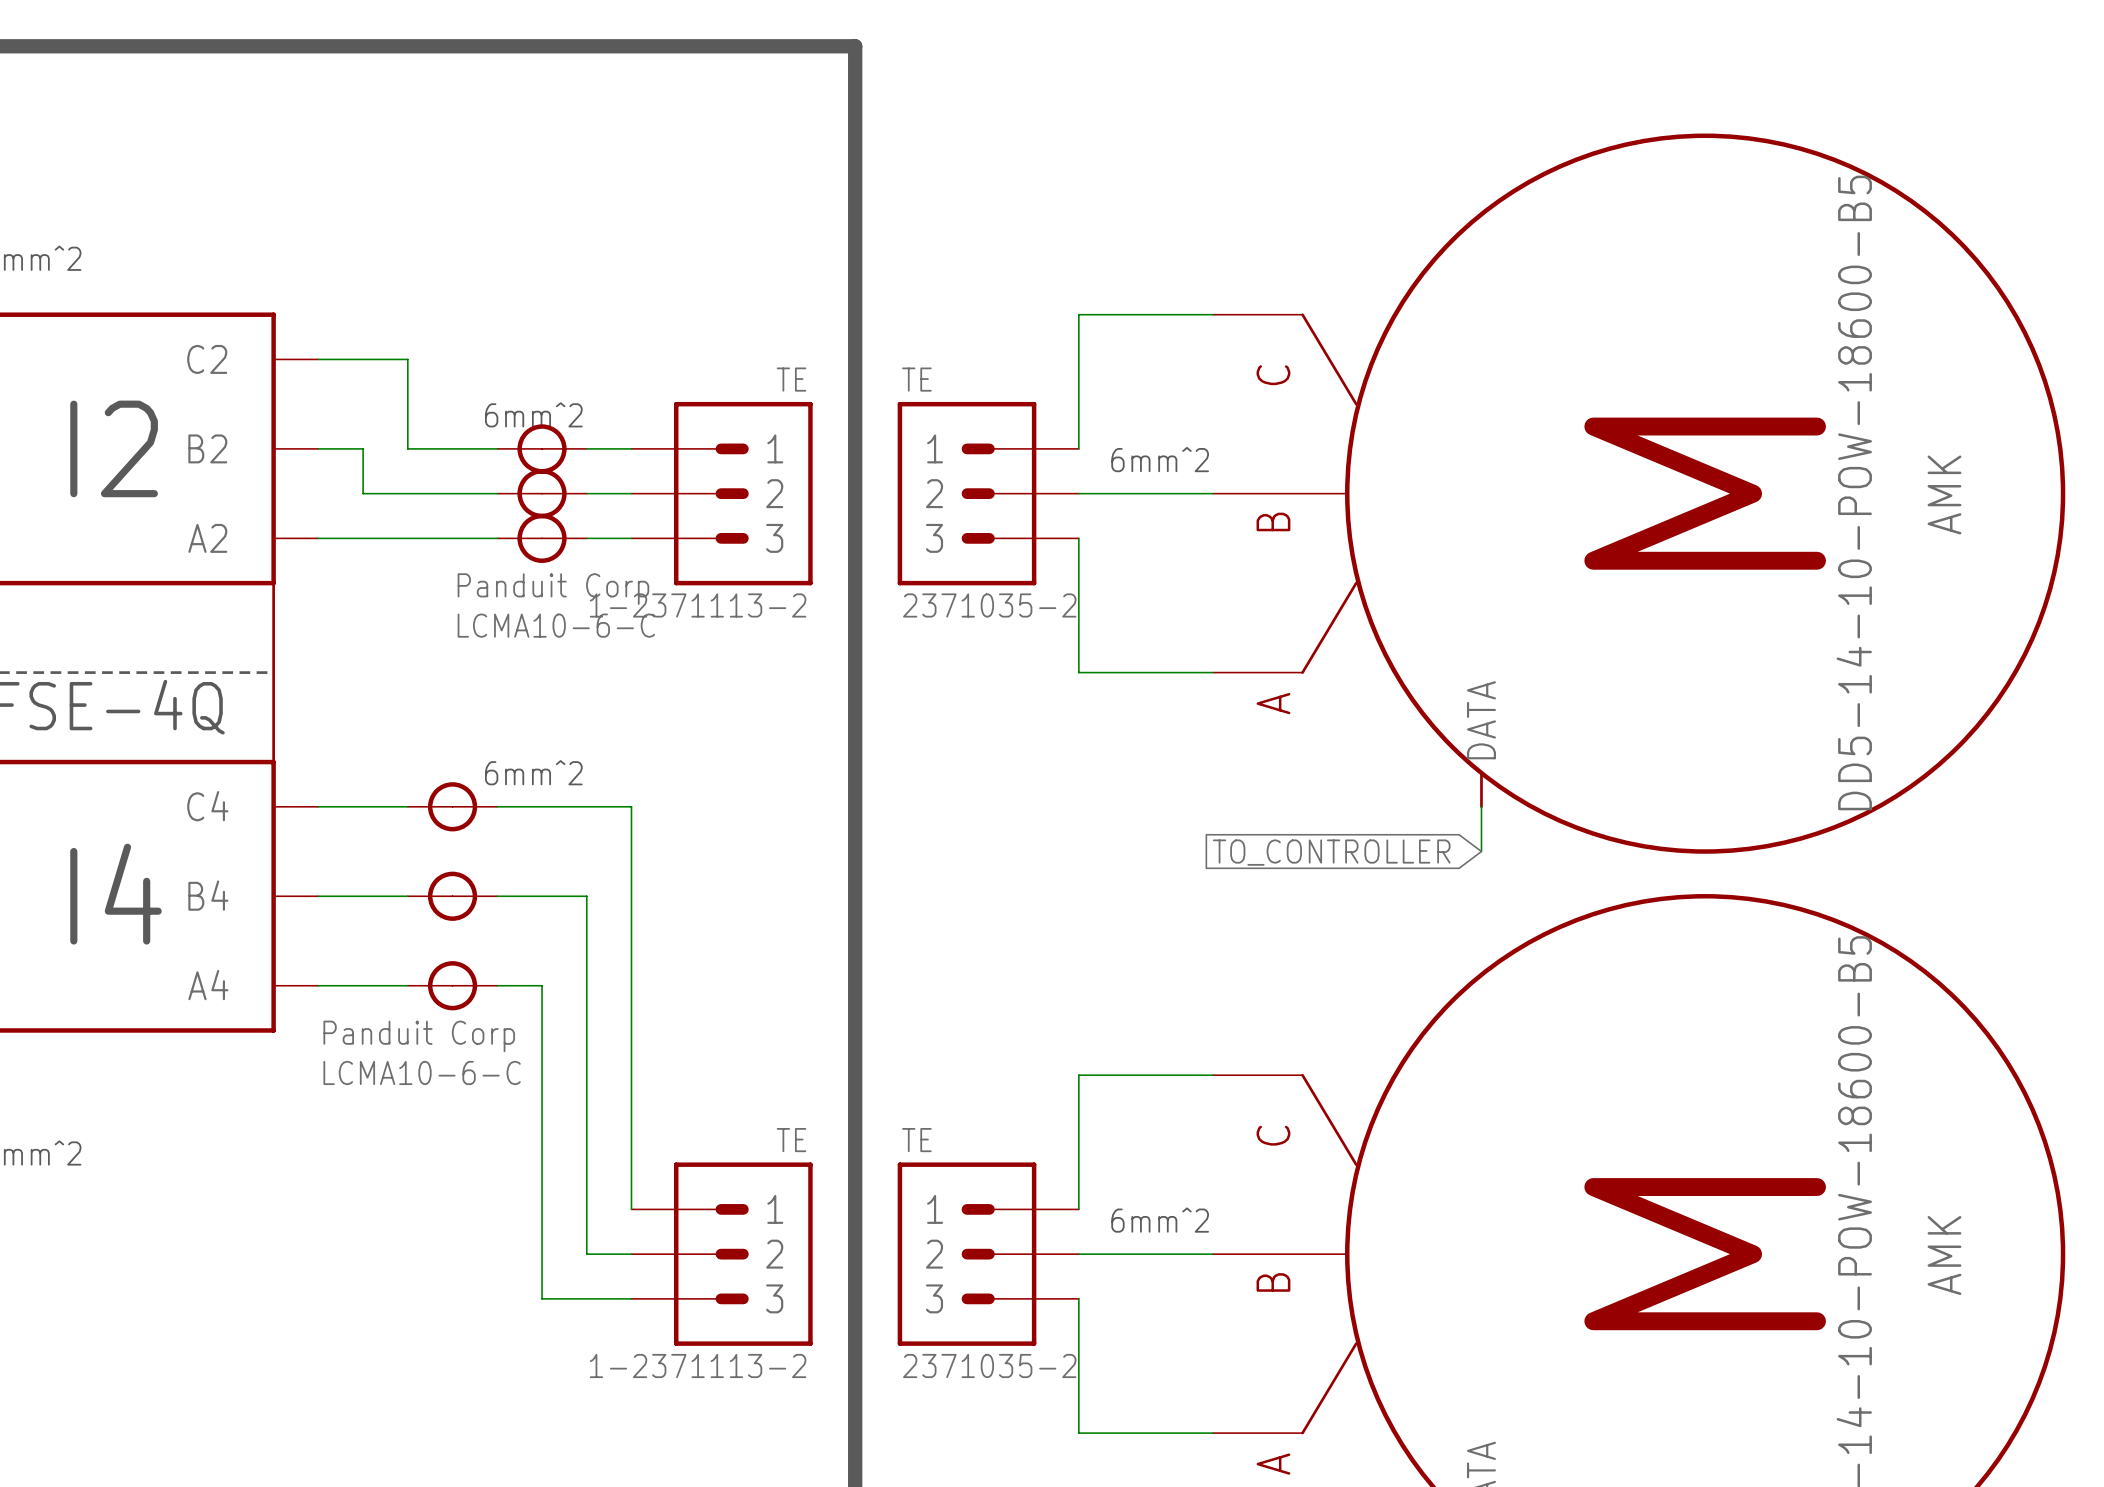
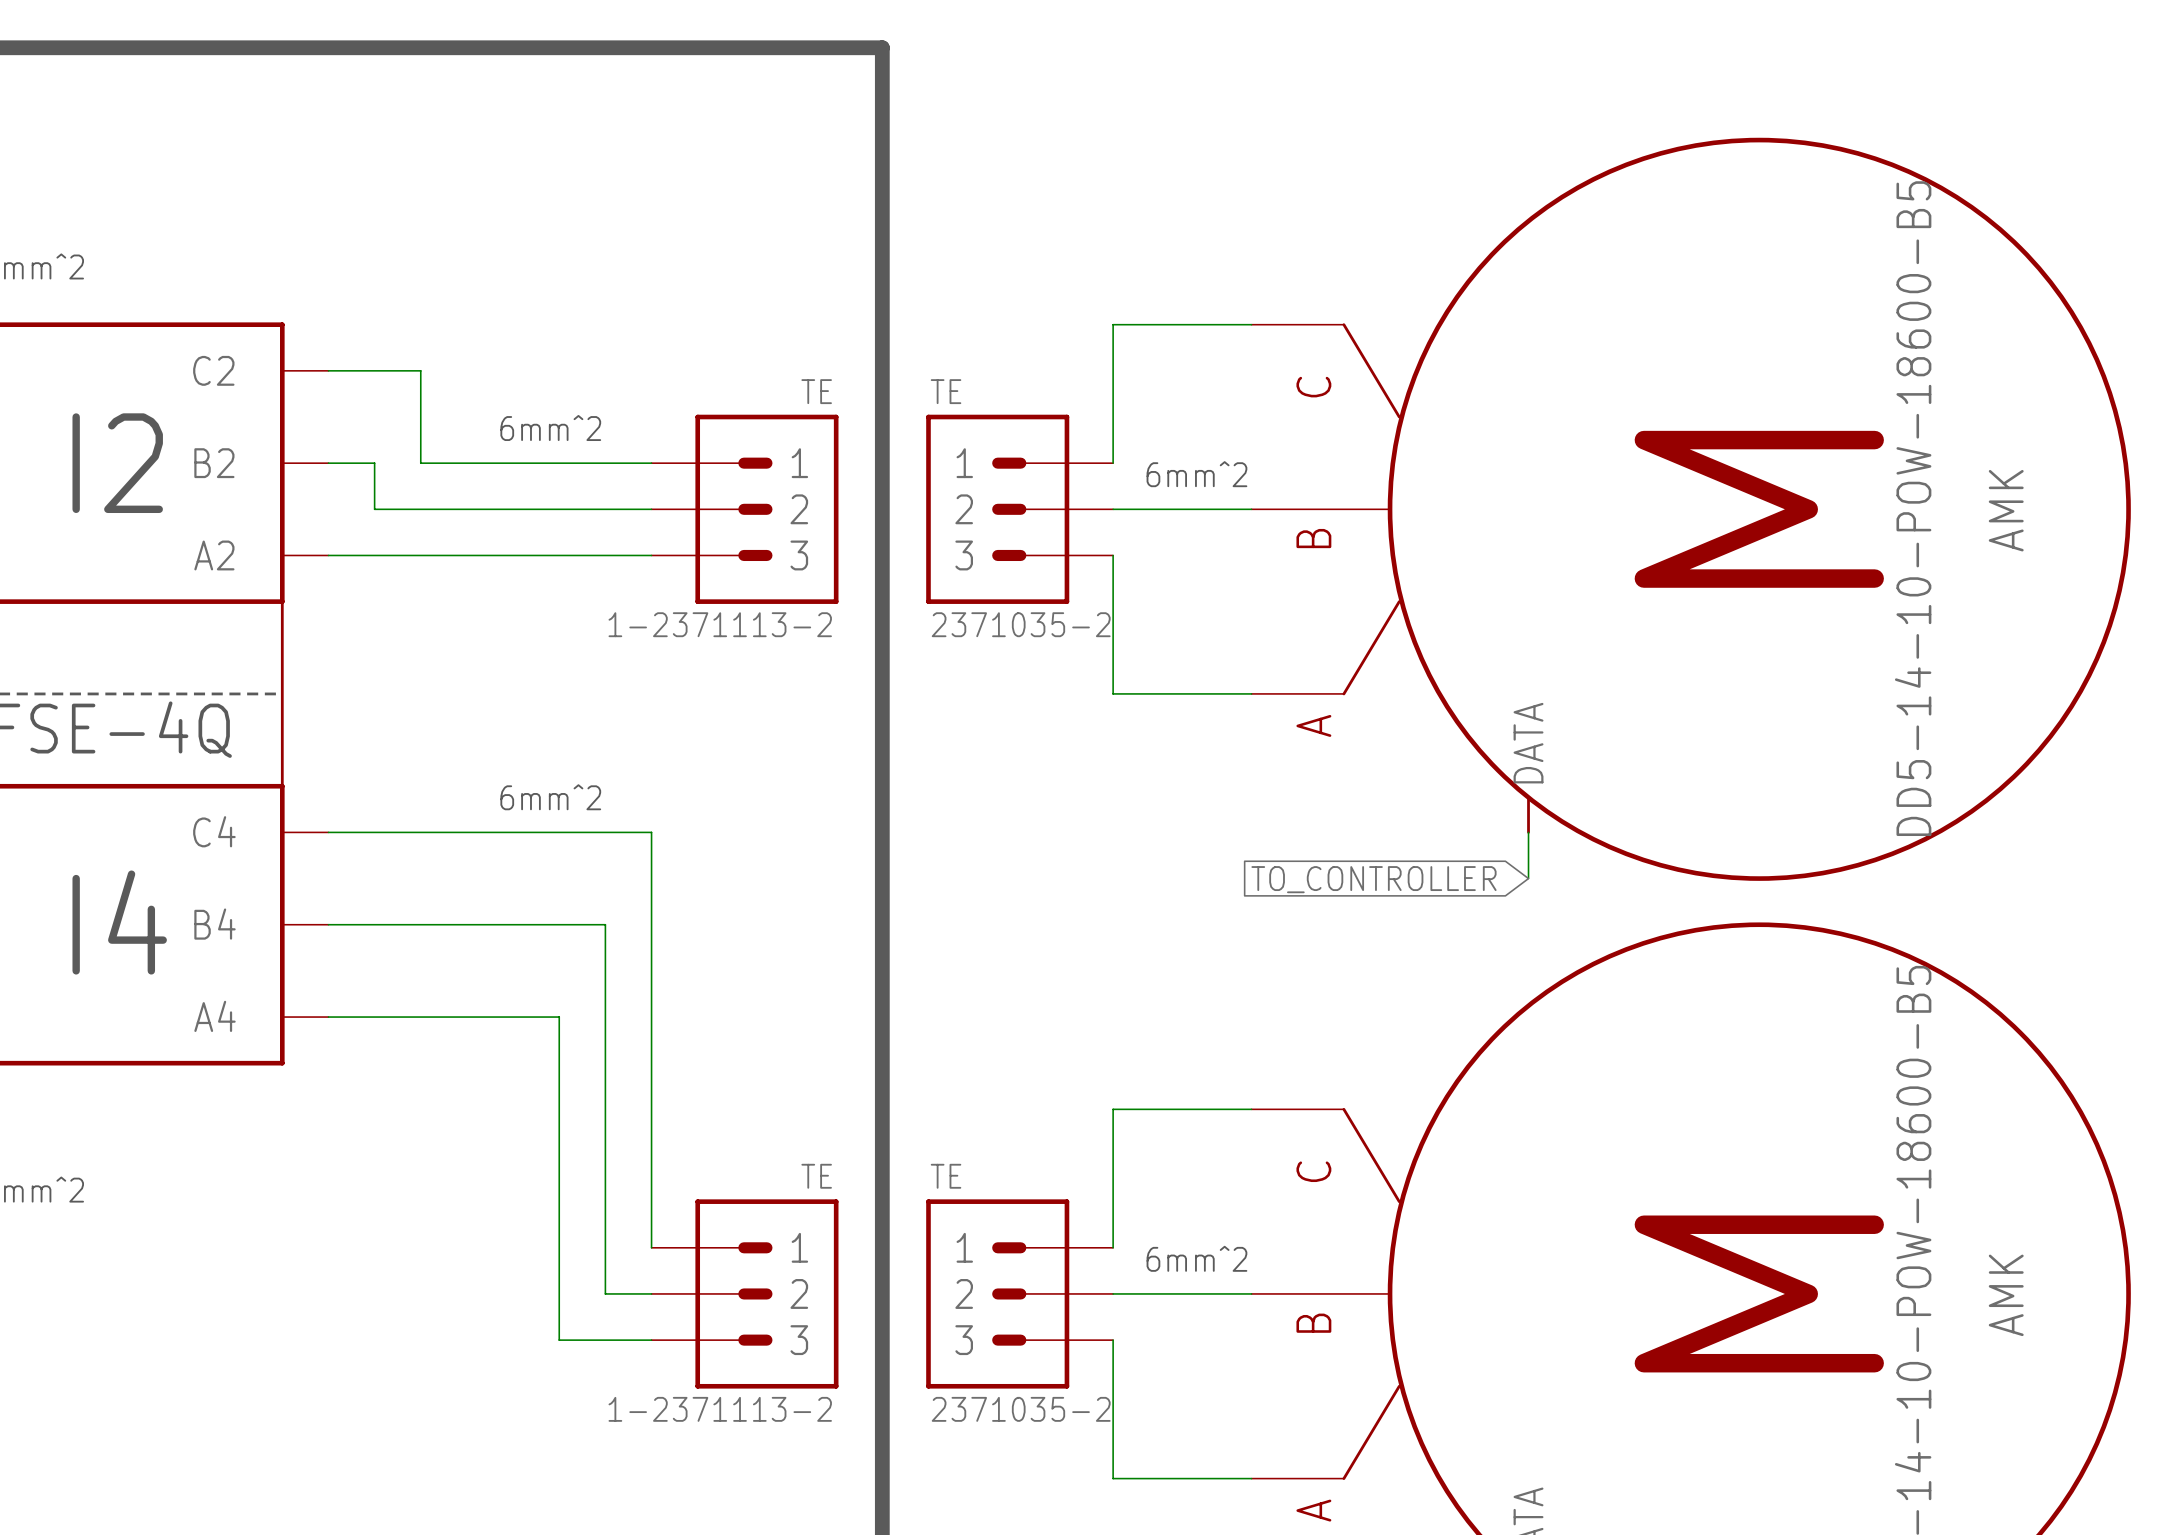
part: (542, 448) -> none
part: (542, 493) -> none
part: (542, 538) -> none
part: (452, 806) -> none
part: (452, 896) -> none
part: (452, 985) -> none

